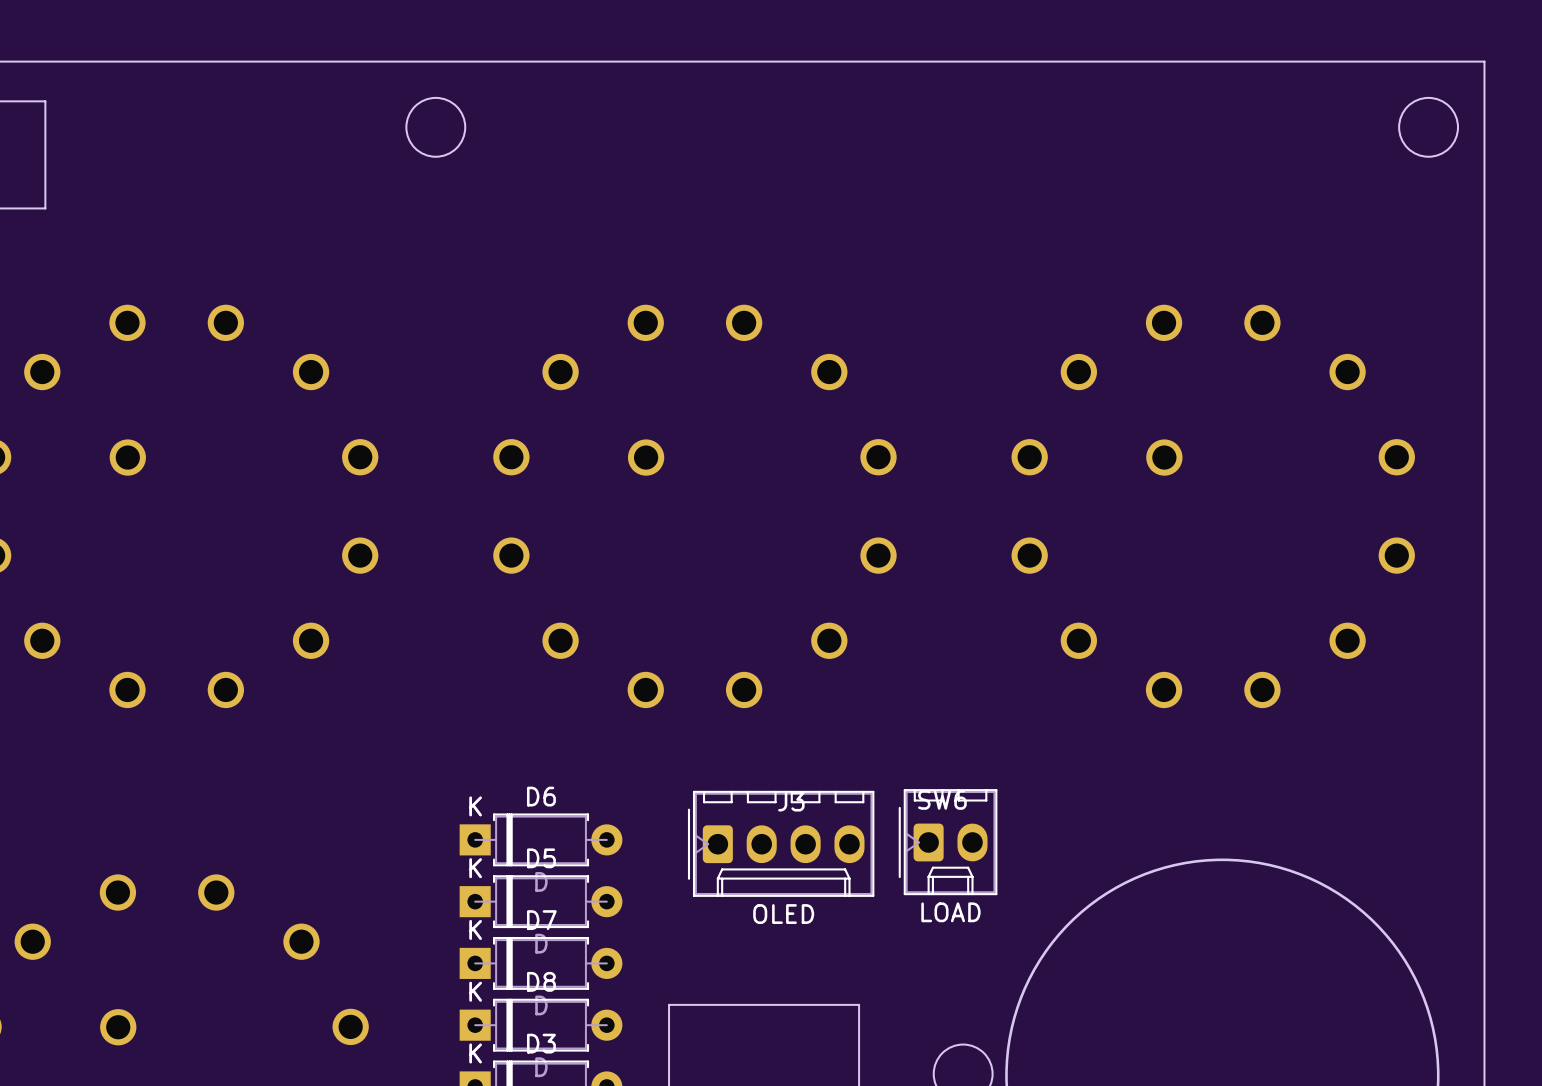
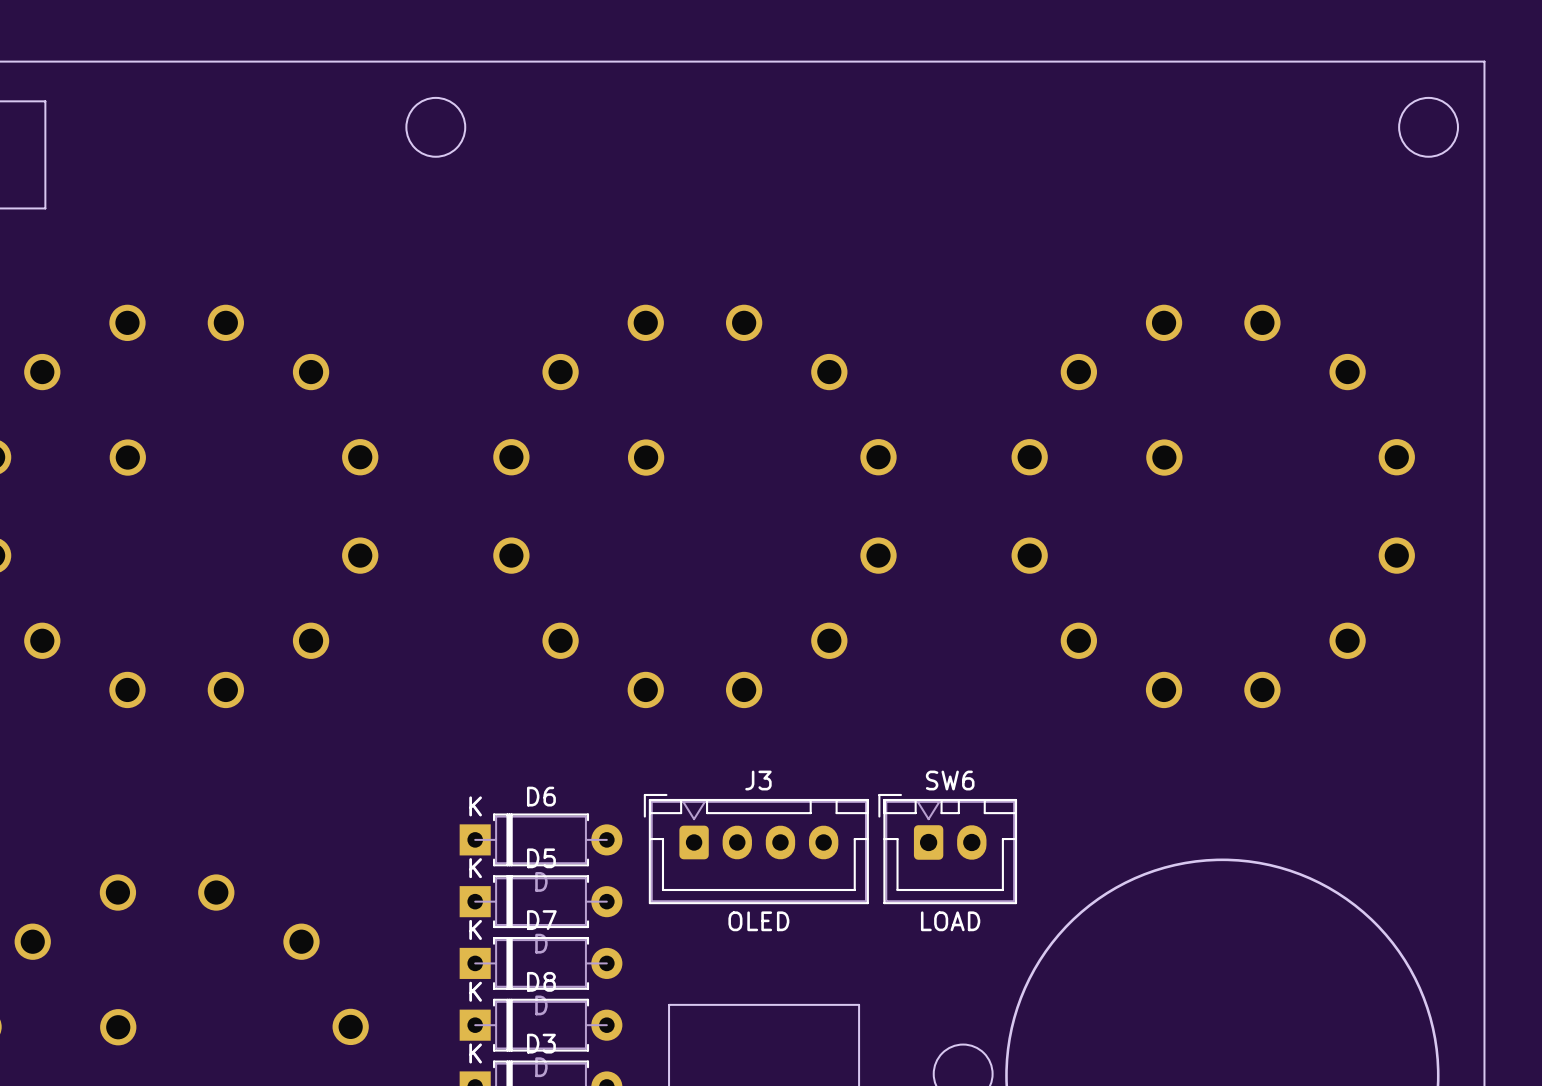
SW6 footprint: [898, 789, 998, 896] -> [878, 793, 1018, 905]
J3 footprint: [687, 790, 875, 897] -> [643, 793, 869, 905]

